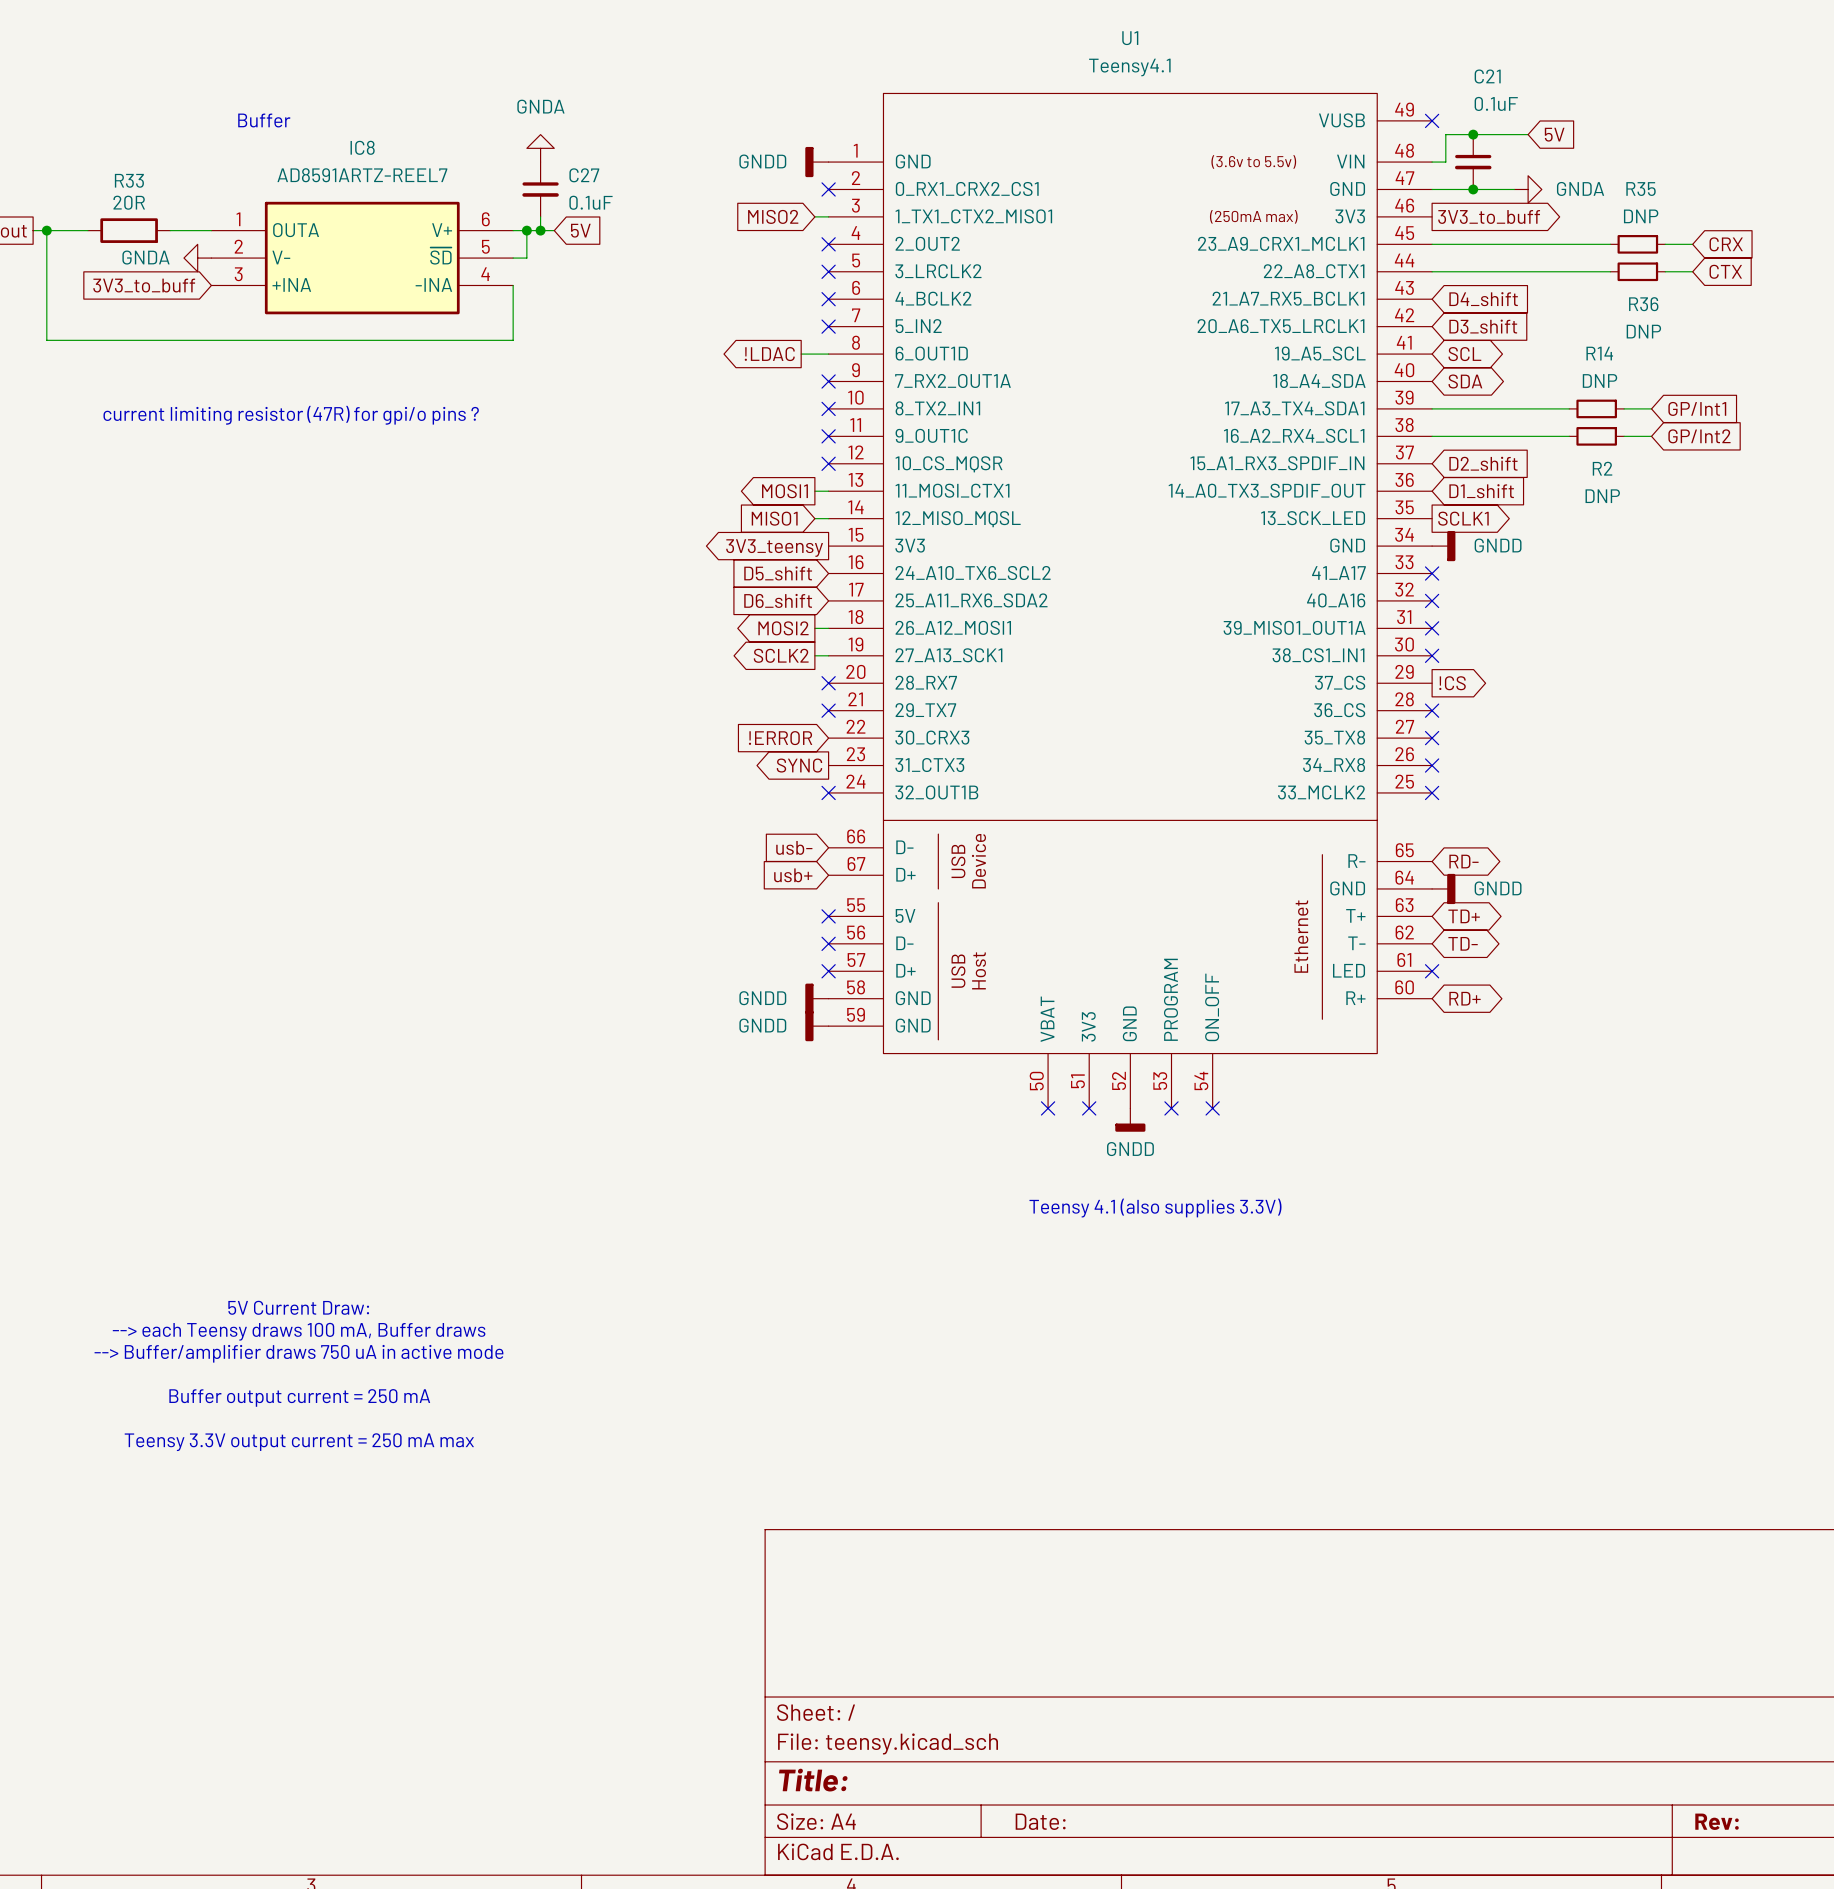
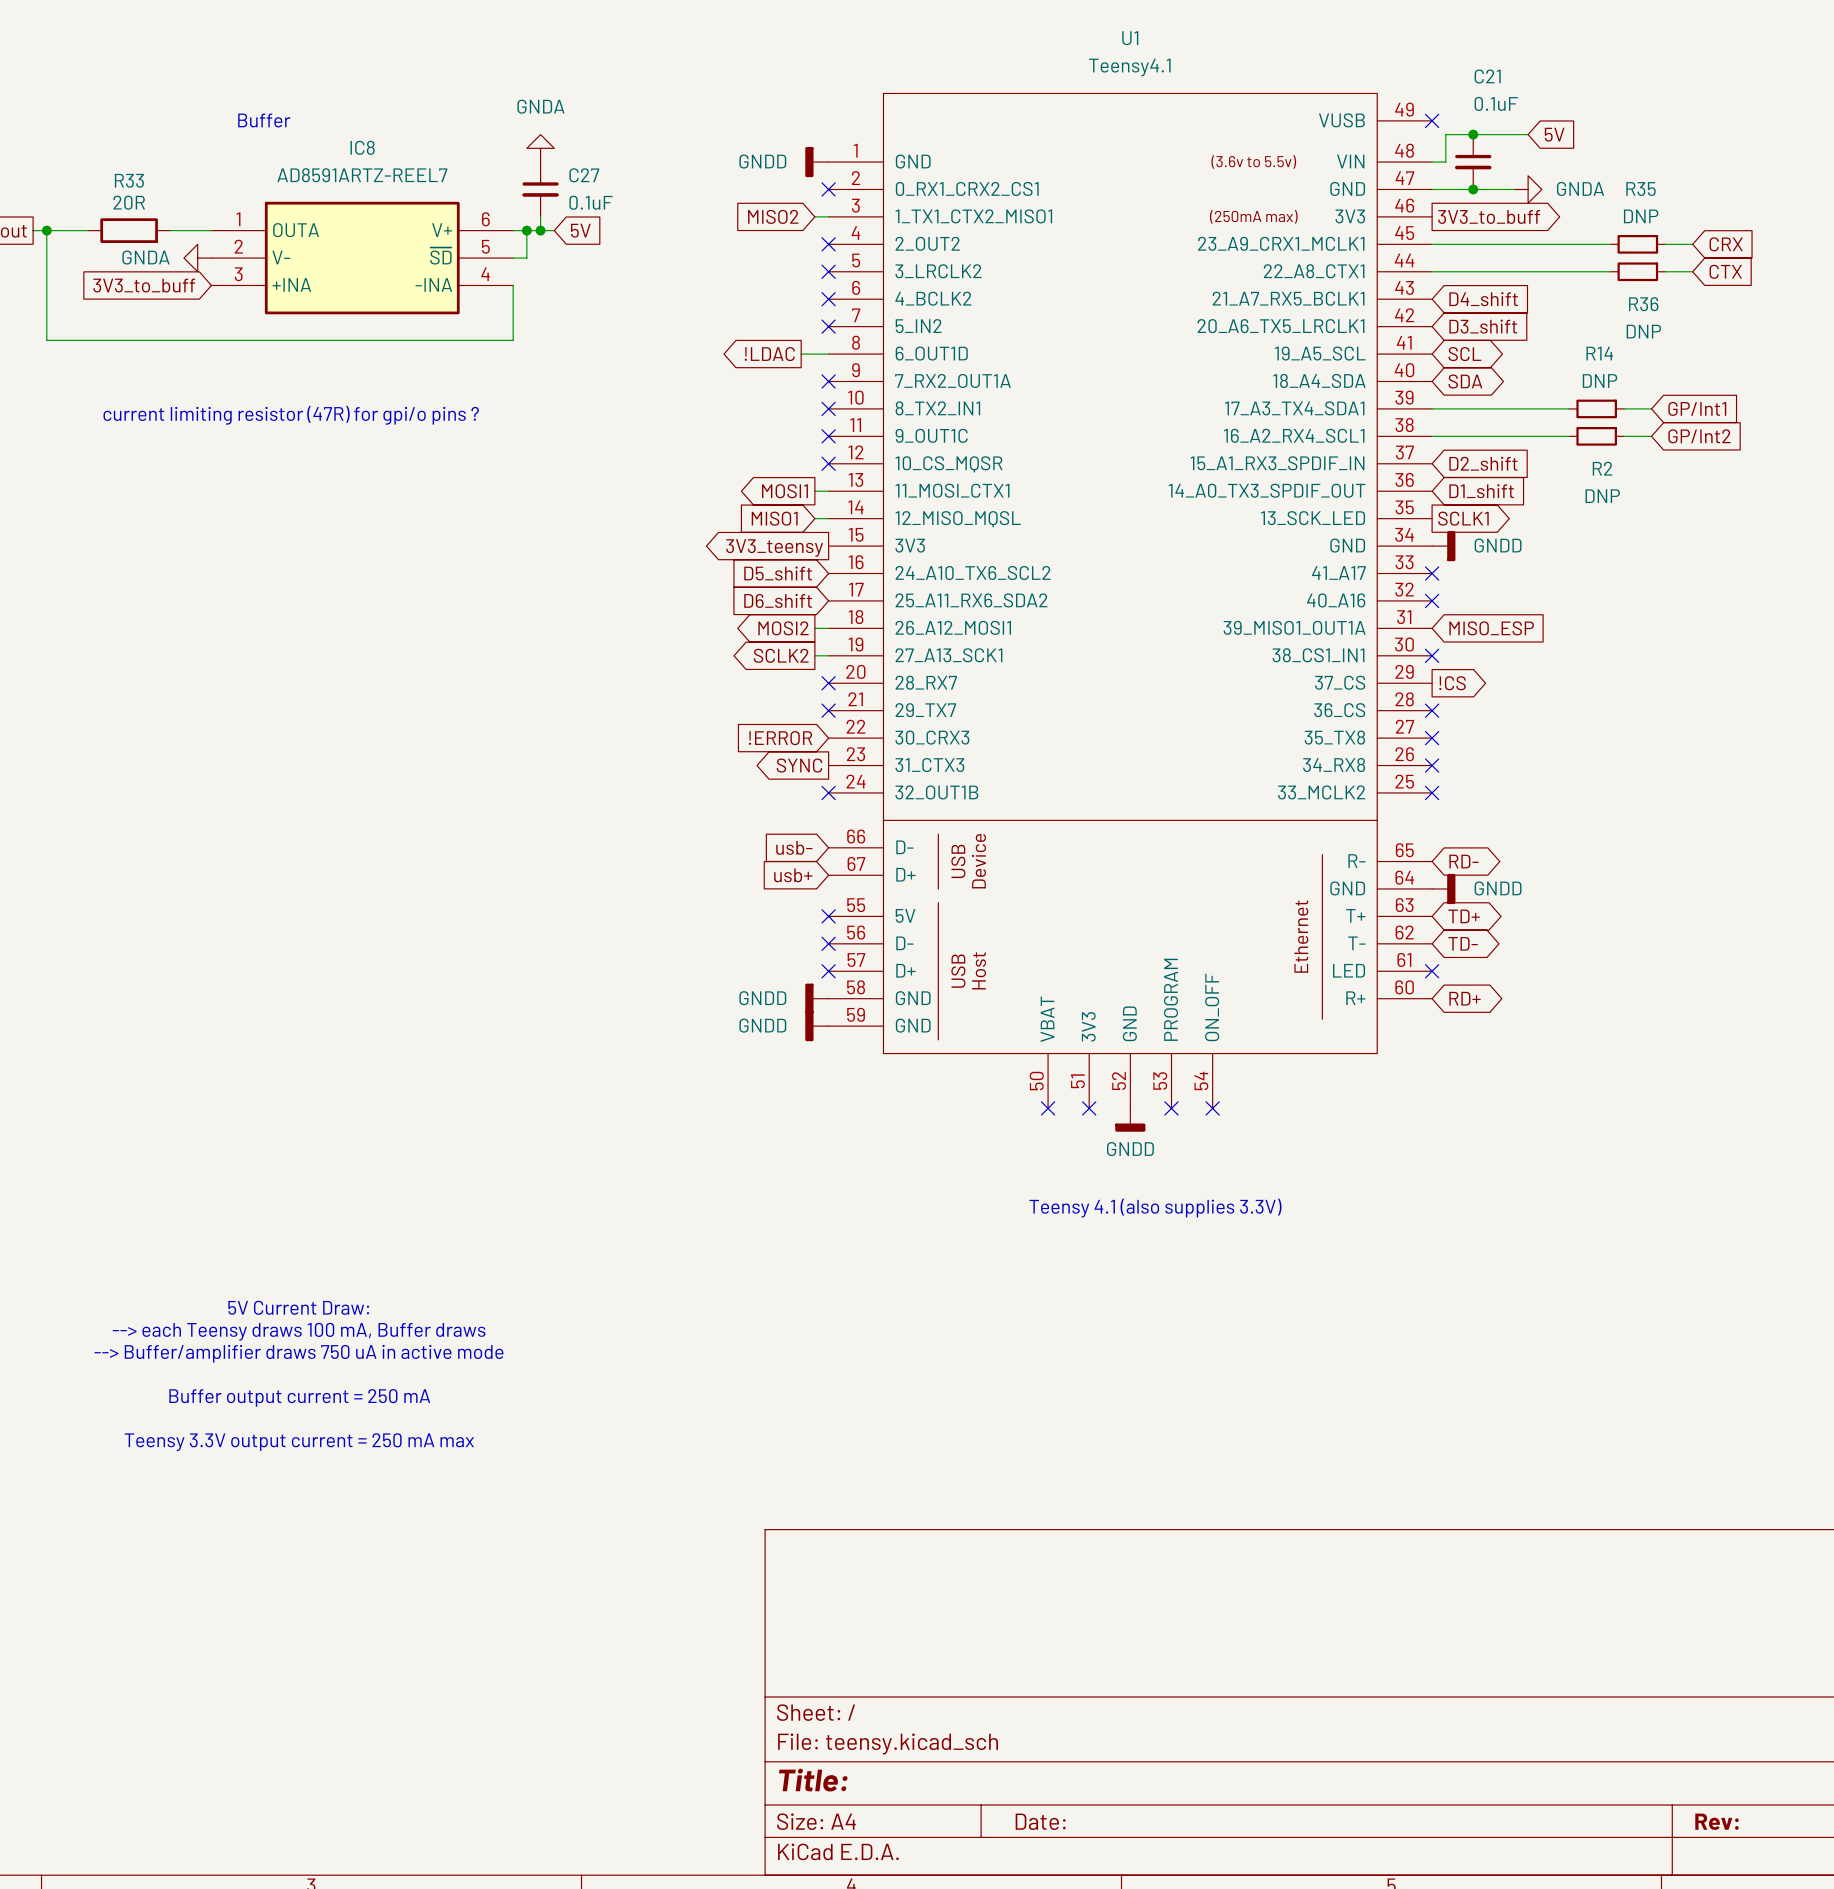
no-connect mark: (1432, 628) -> none
global label: none -> MISO_ESP (1491, 628)

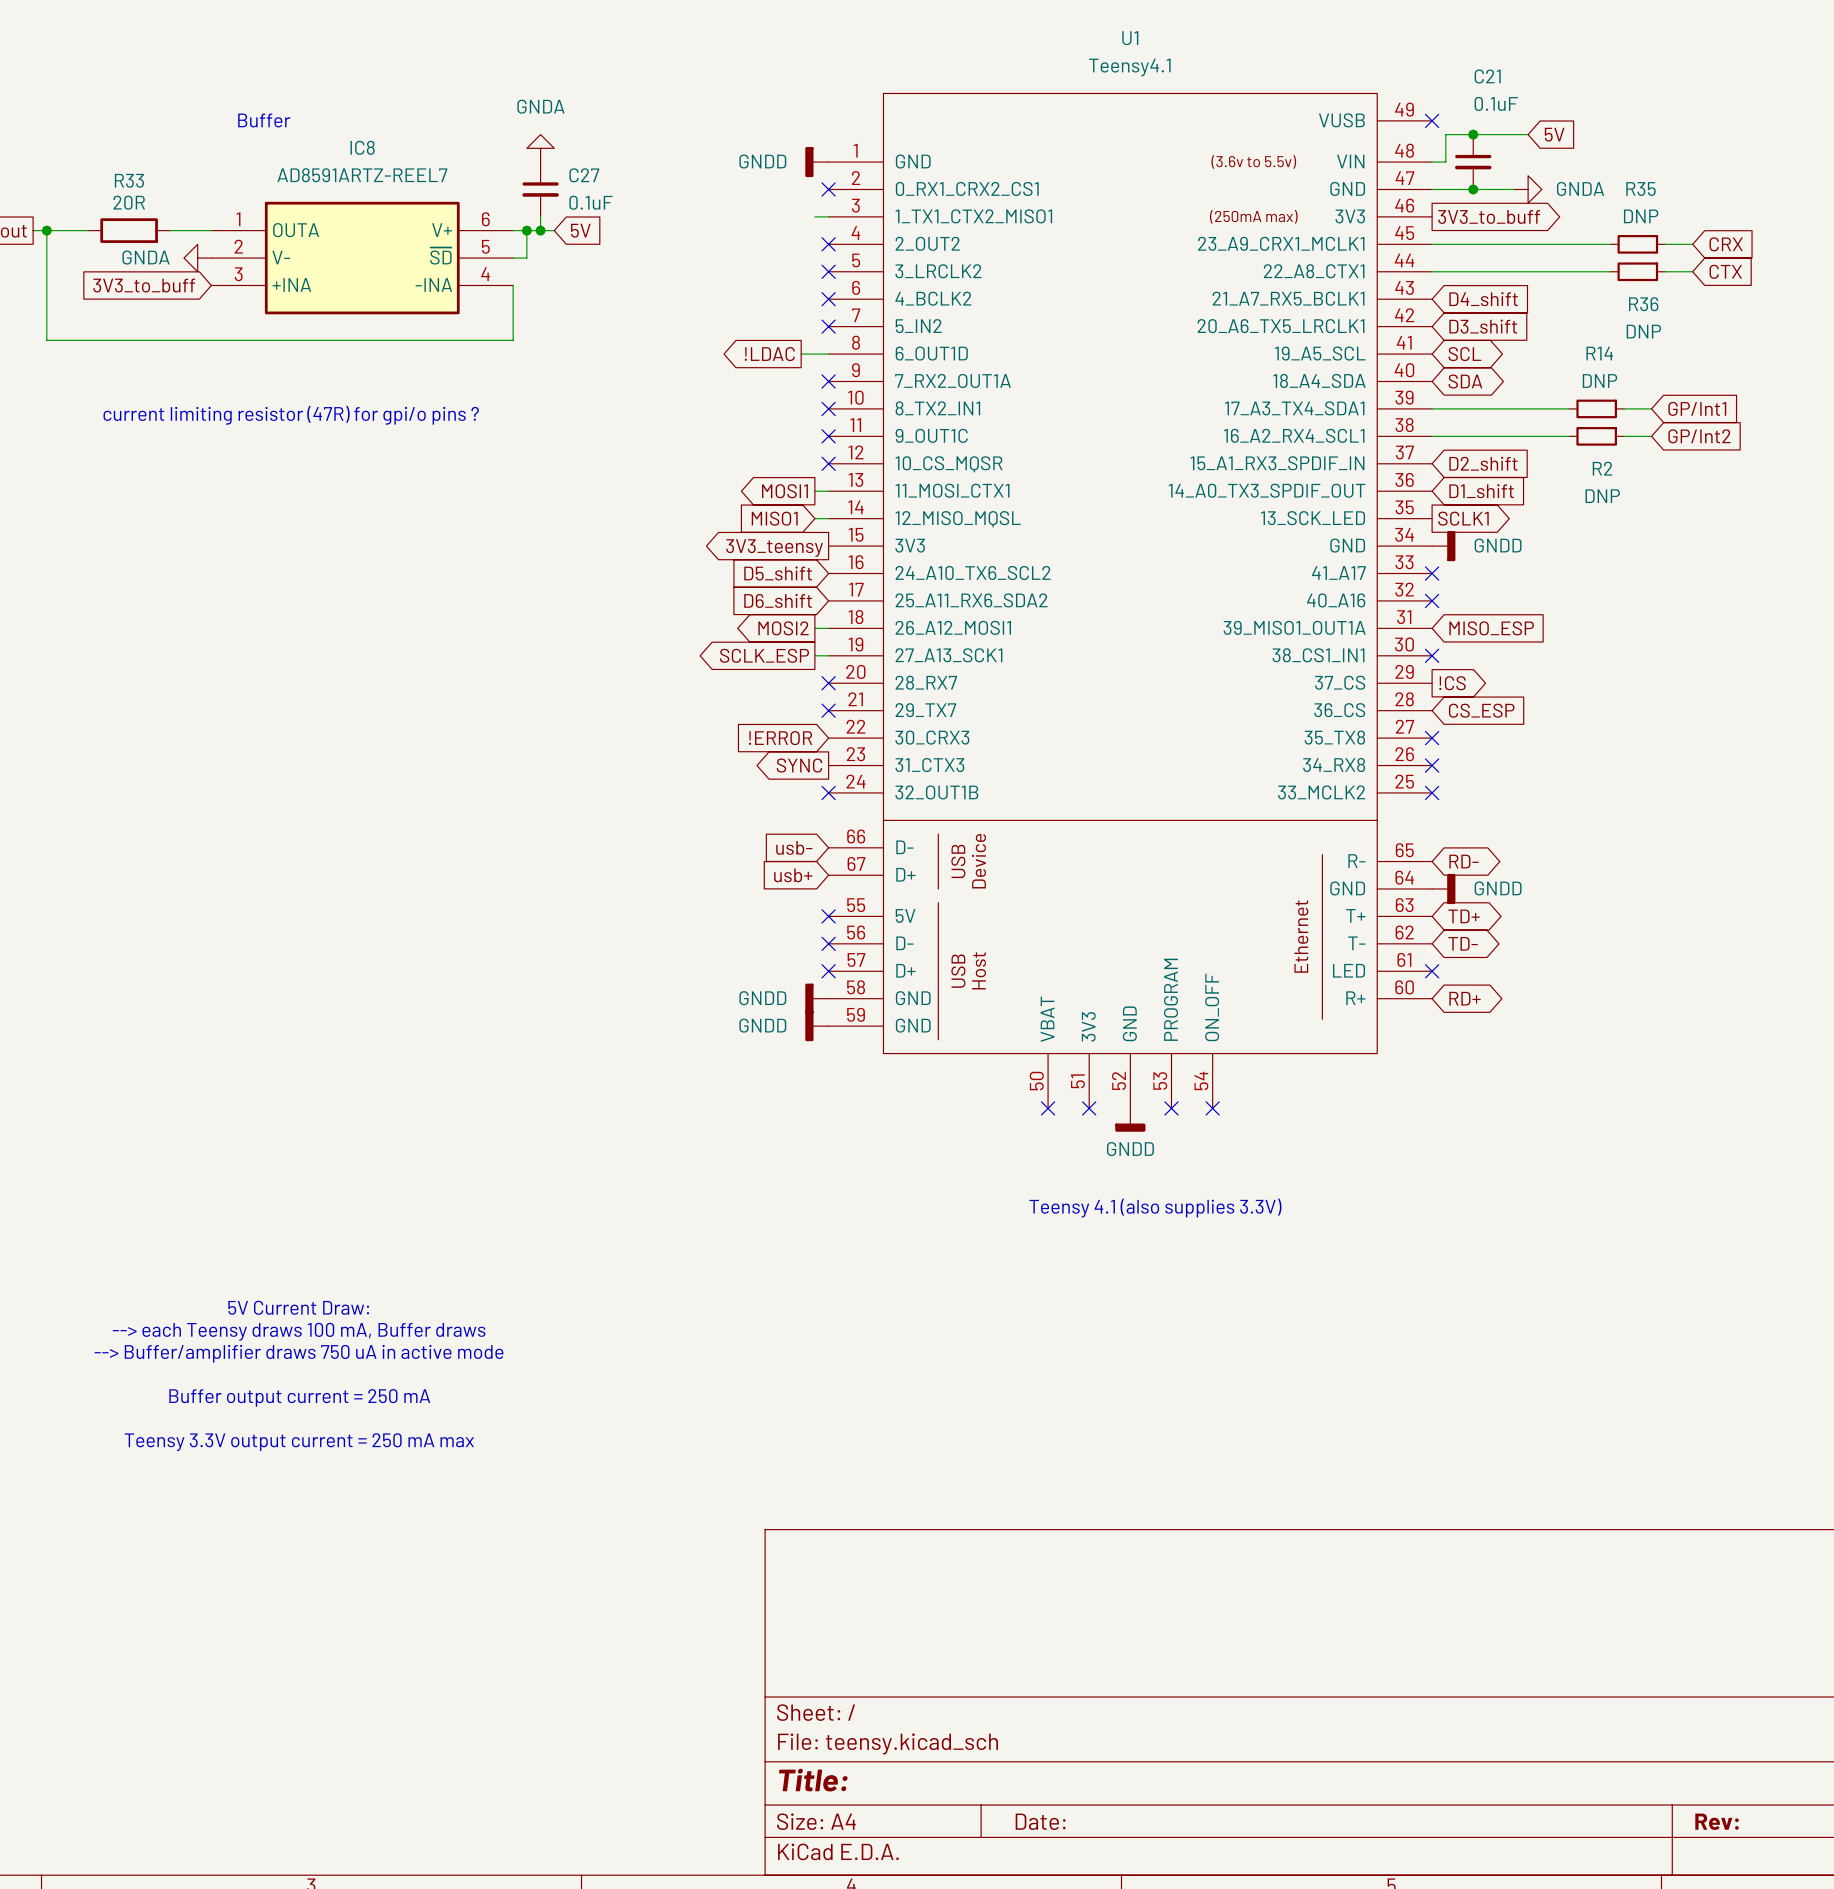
global label: MISO2 (773, 216) -> none
global label: SCLK2 (781, 655) -> SCLK_ESP (764, 655)
no-connect mark: (1432, 710) -> none
global label: none -> CS_ESP (1481, 710)

